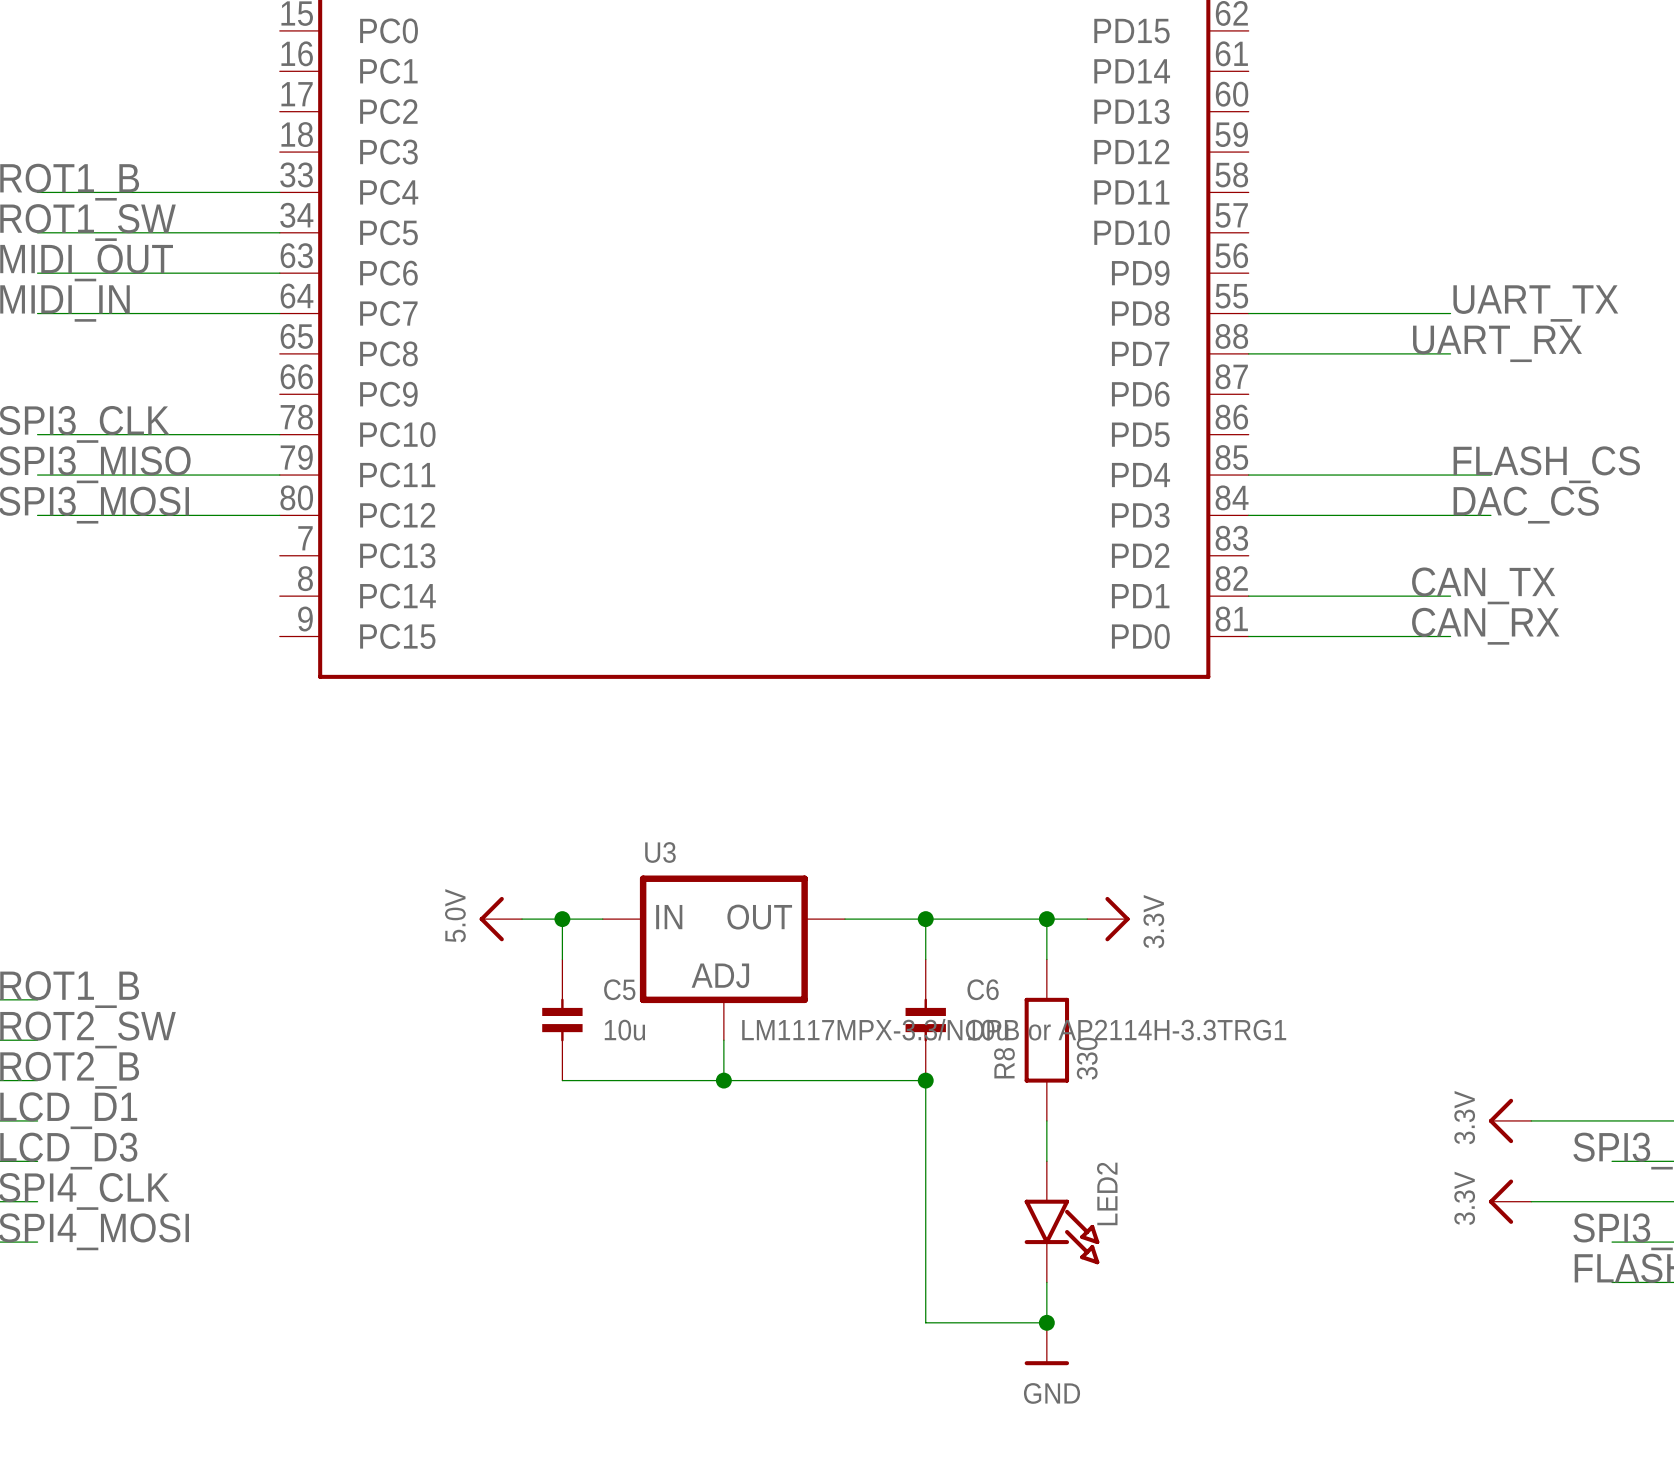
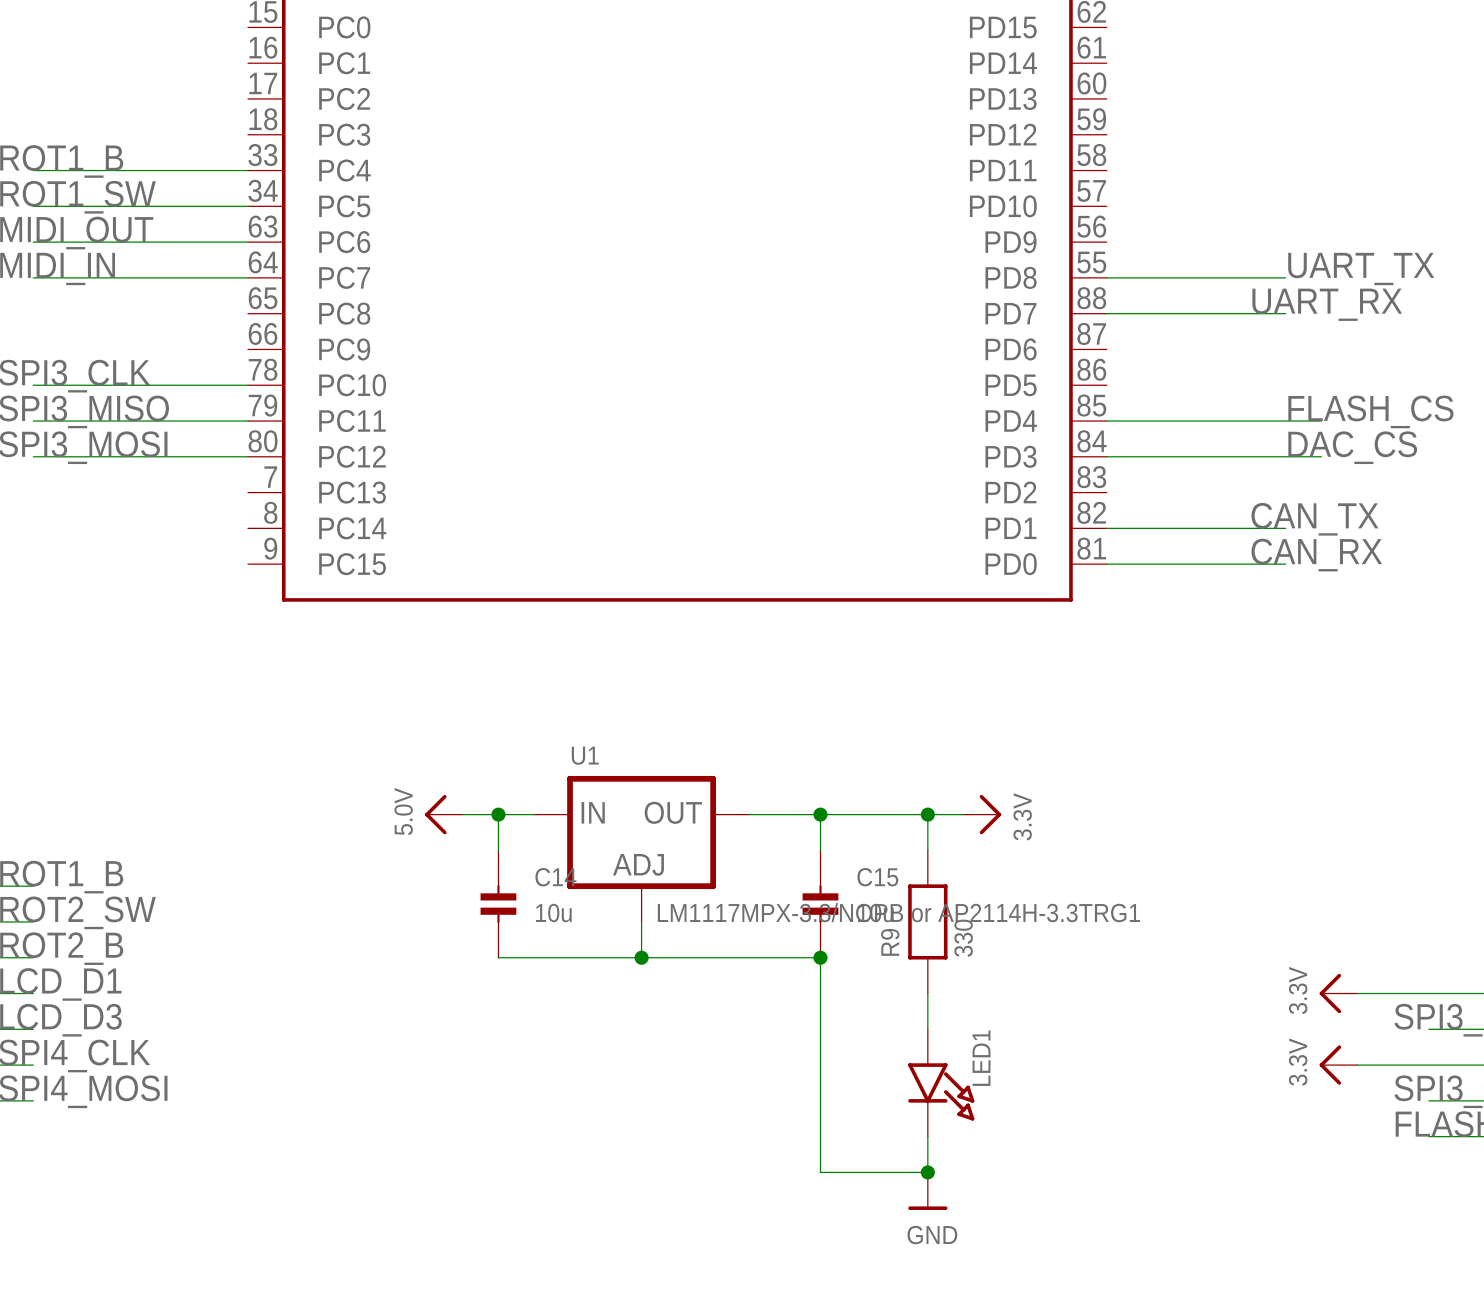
U3 name: U3 (660, 852) -> U1 (585, 755)
C5 name: C5 (619, 989) -> C14 (555, 877)
C6 name: C6 (983, 989) -> C15 (877, 877)
R8 name: R8 (1004, 1063) -> R9 (890, 942)
LED2 name: LED2 (1107, 1193) -> LED1 (981, 1058)

